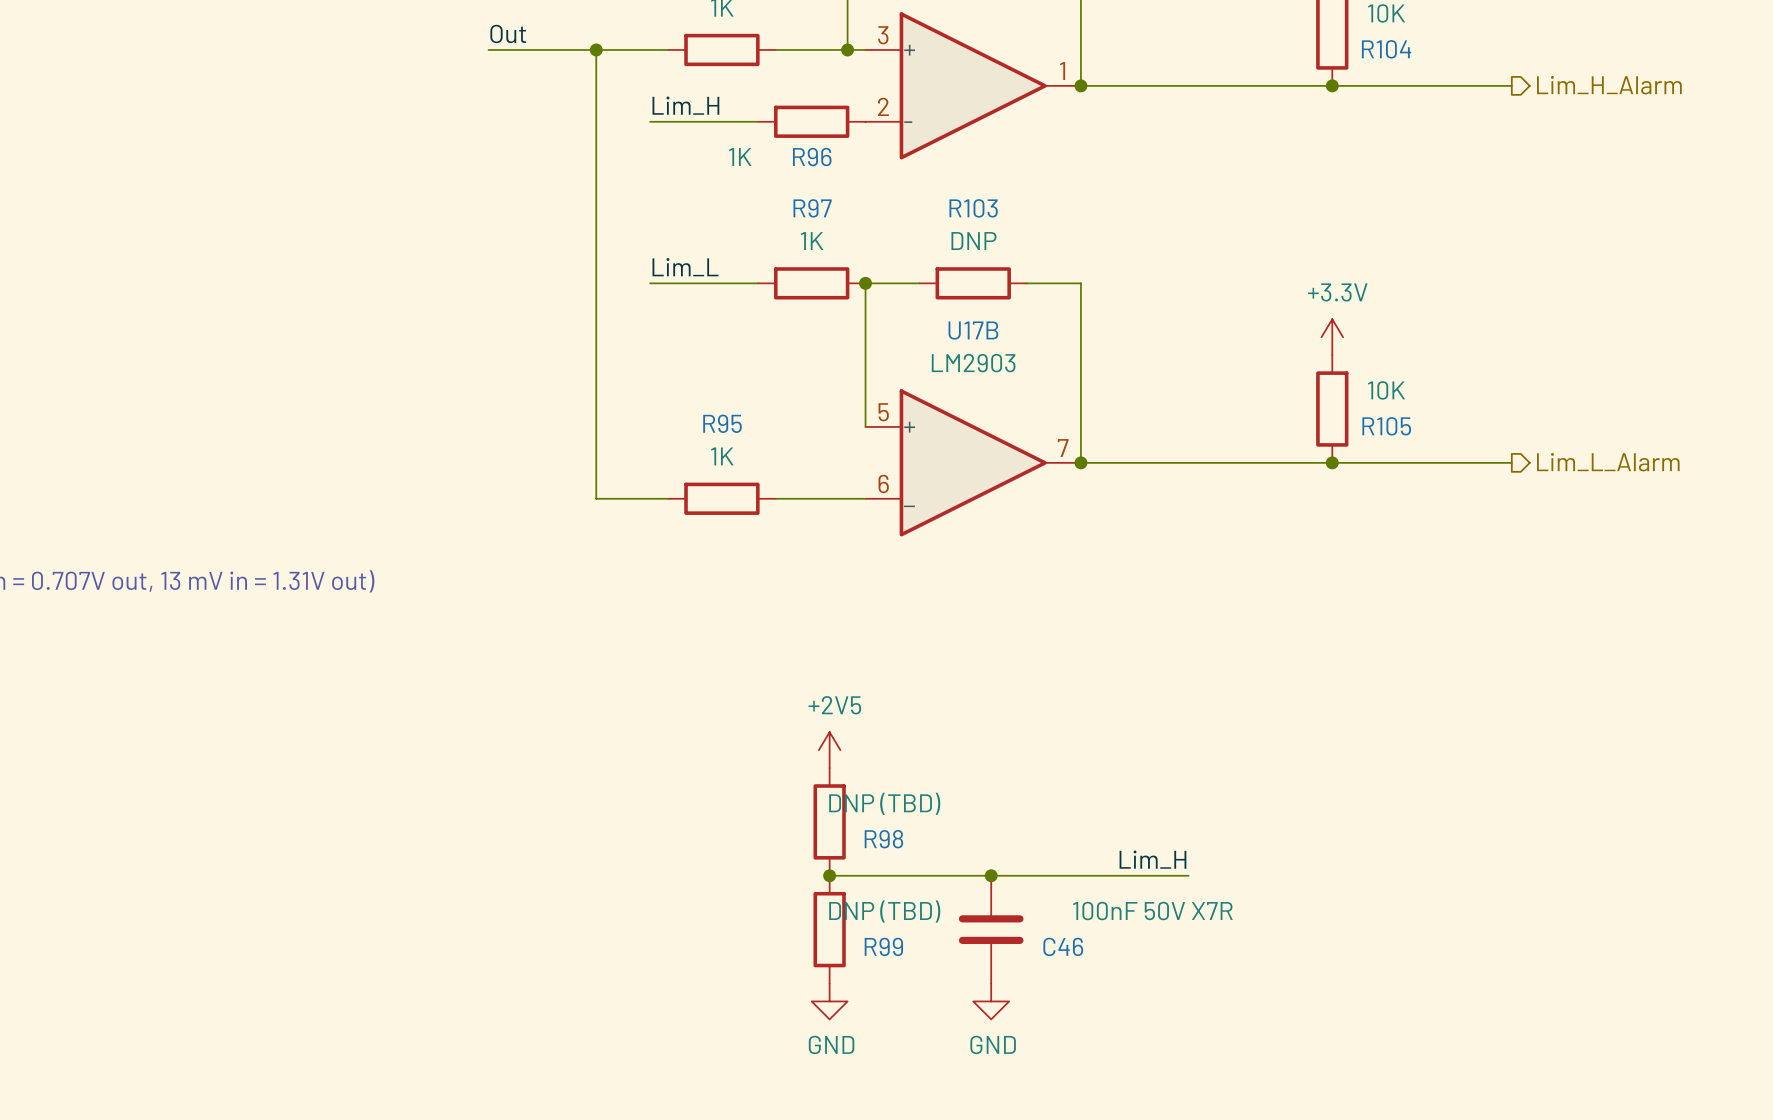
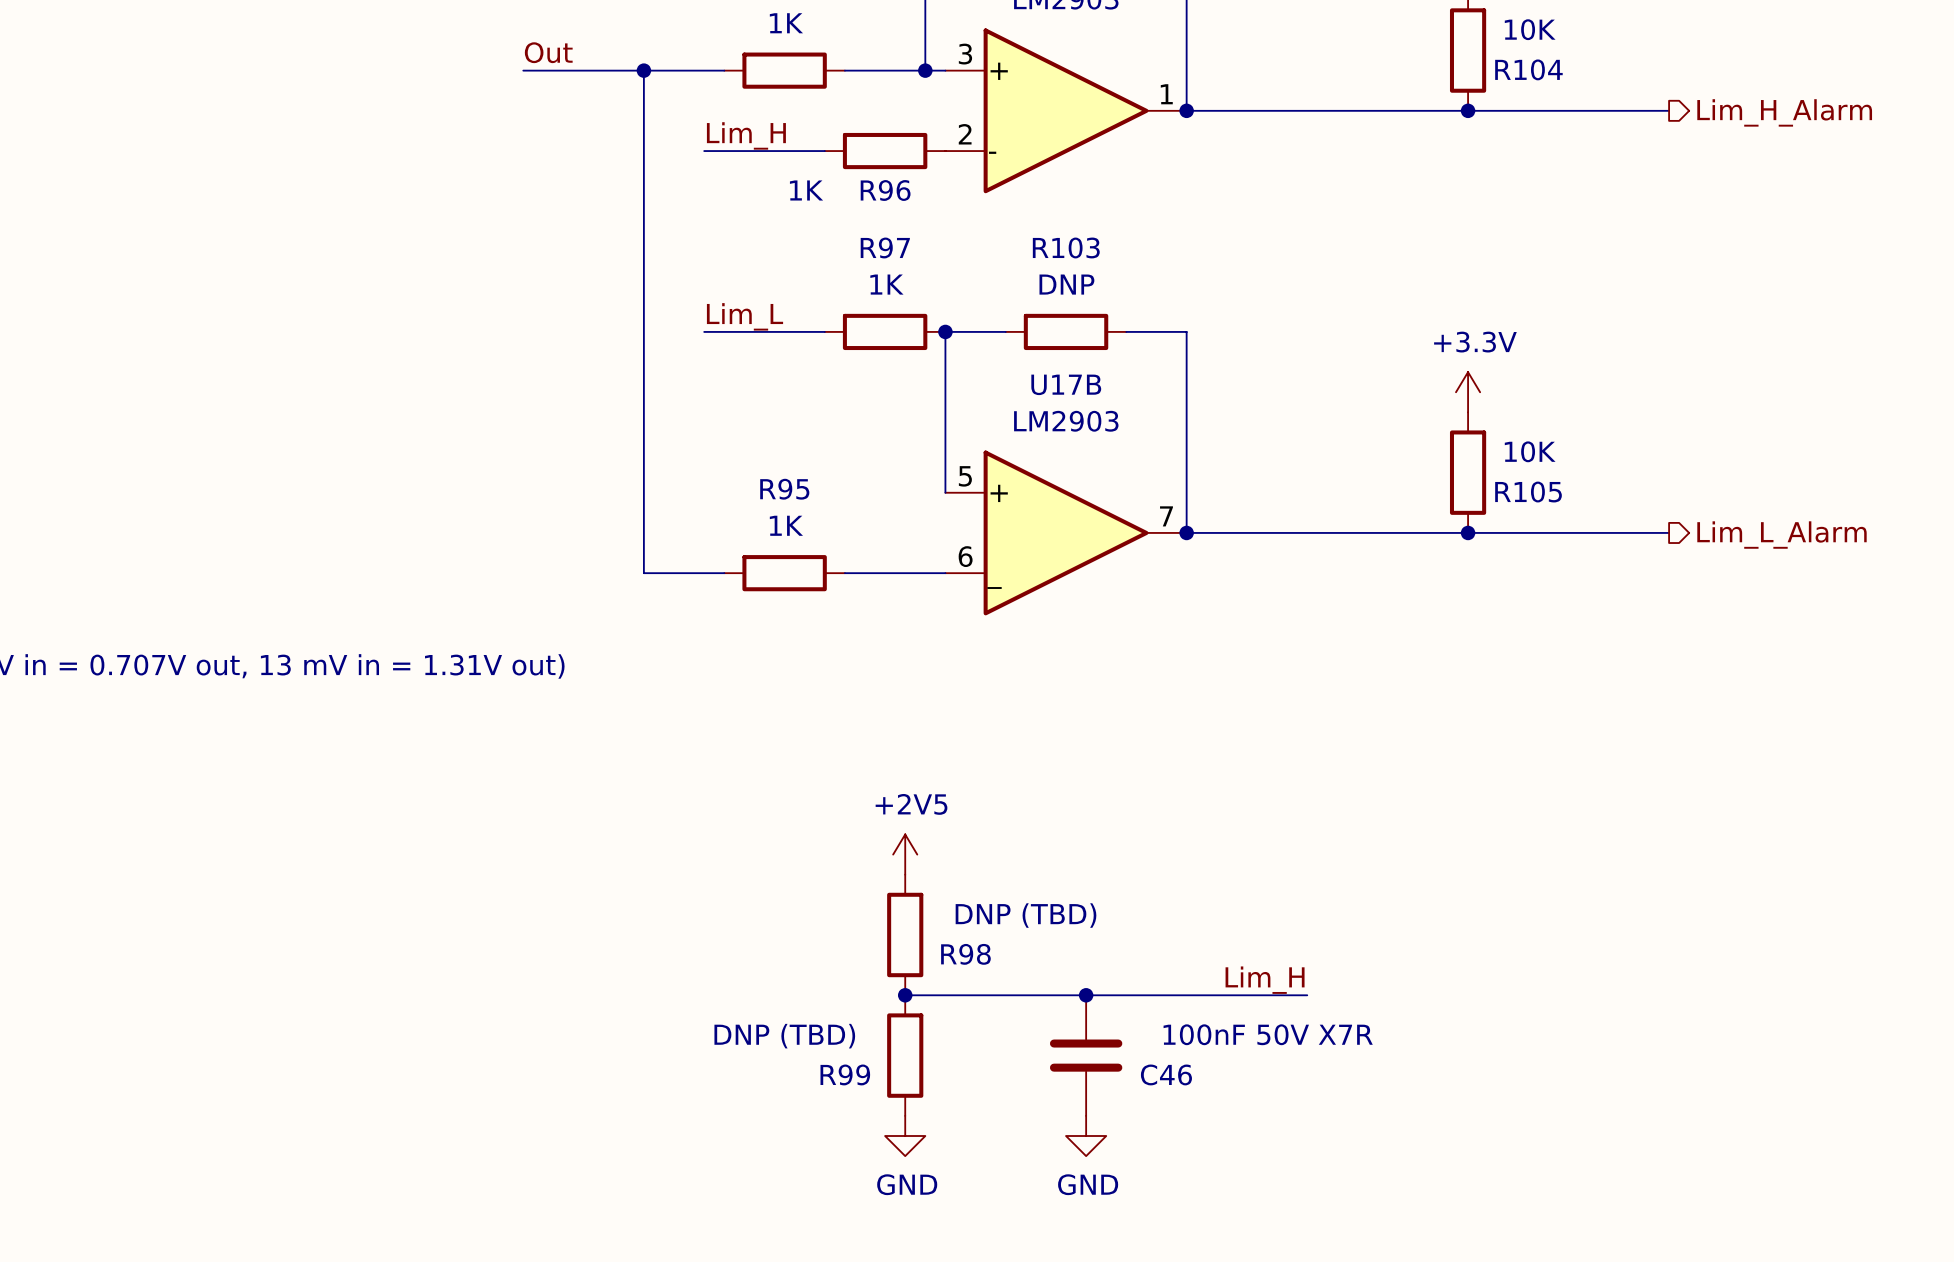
R98 value position: DNP (TBD) (884, 803) -> DNP (TBD) (1026, 915)
R99 value position: DNP (TBD) (884, 911) -> DNP (TBD) (784, 1036)
R99 name position: R99 (883, 946) -> R99 (845, 1074)

